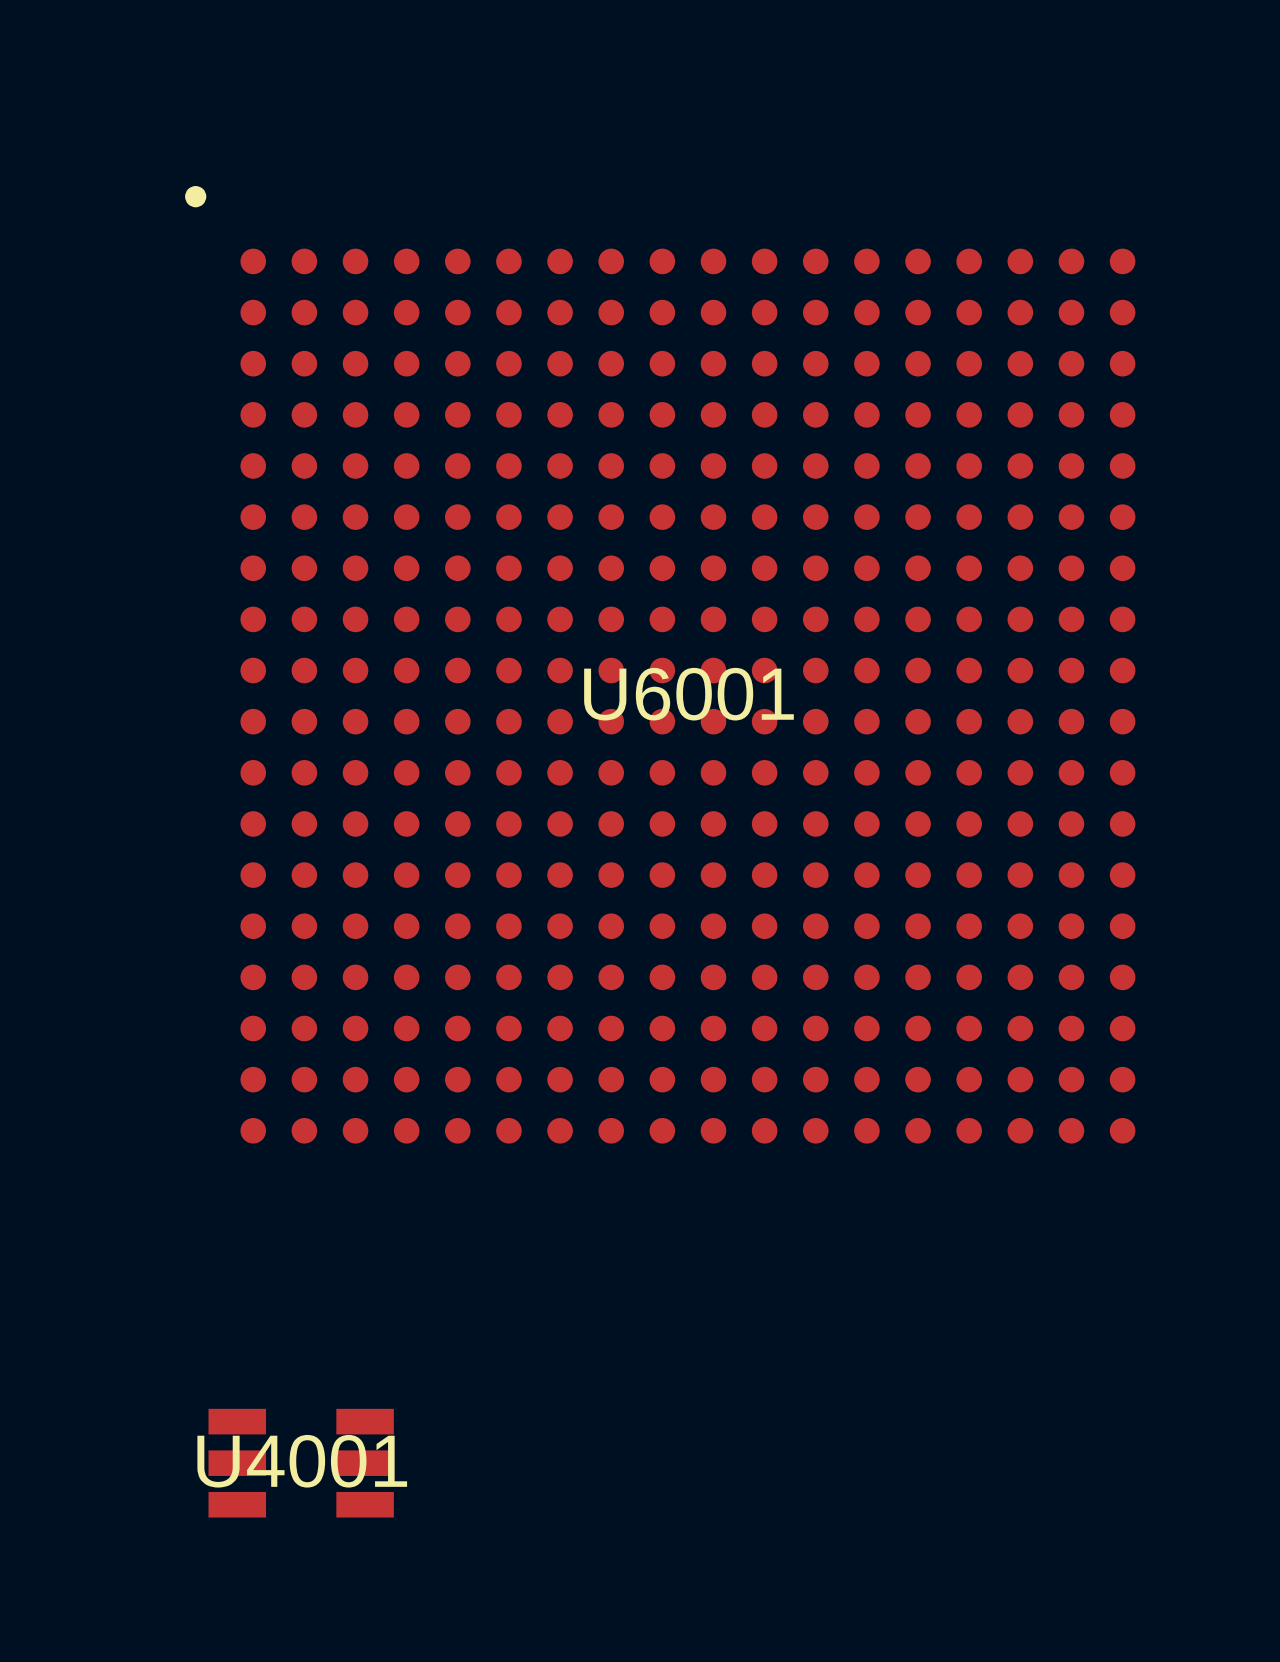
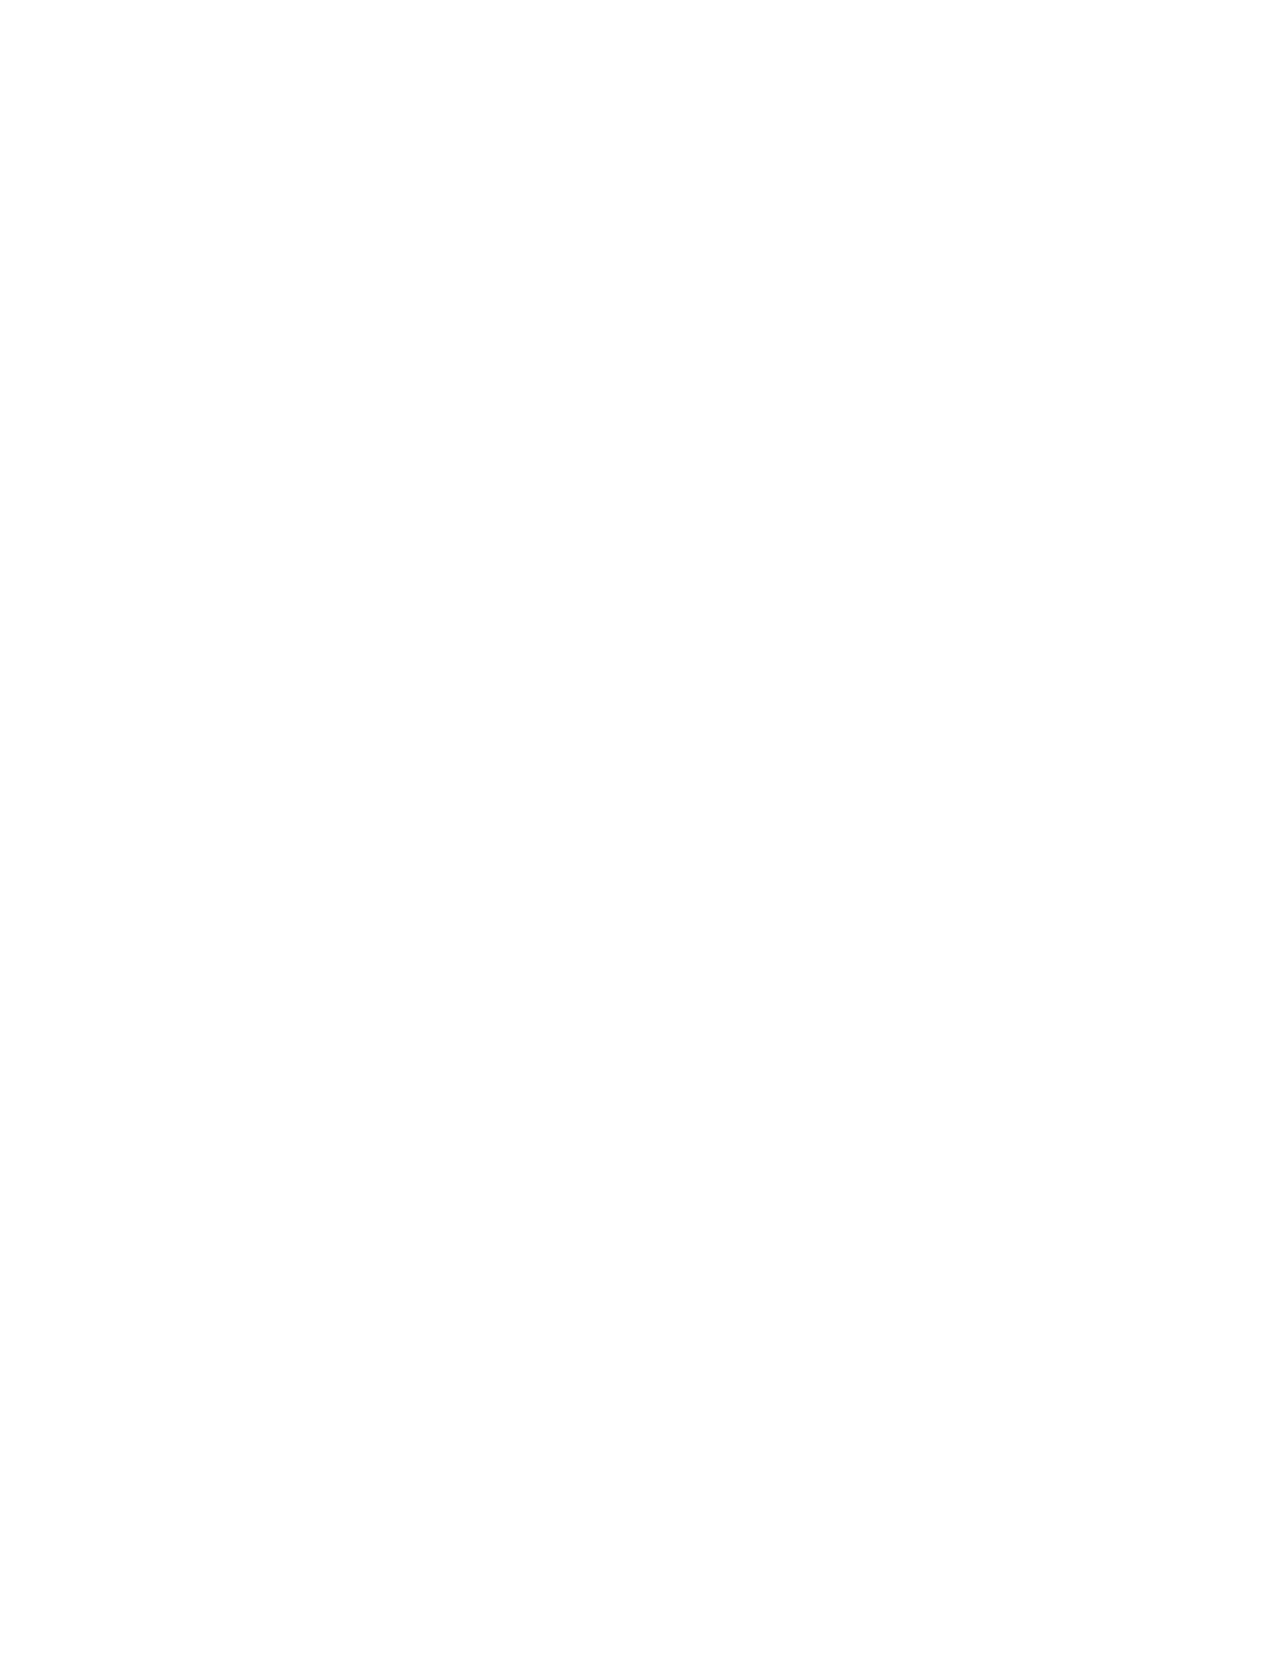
U6001: (687, 696) -> none
U4001: (301, 1463) -> none

